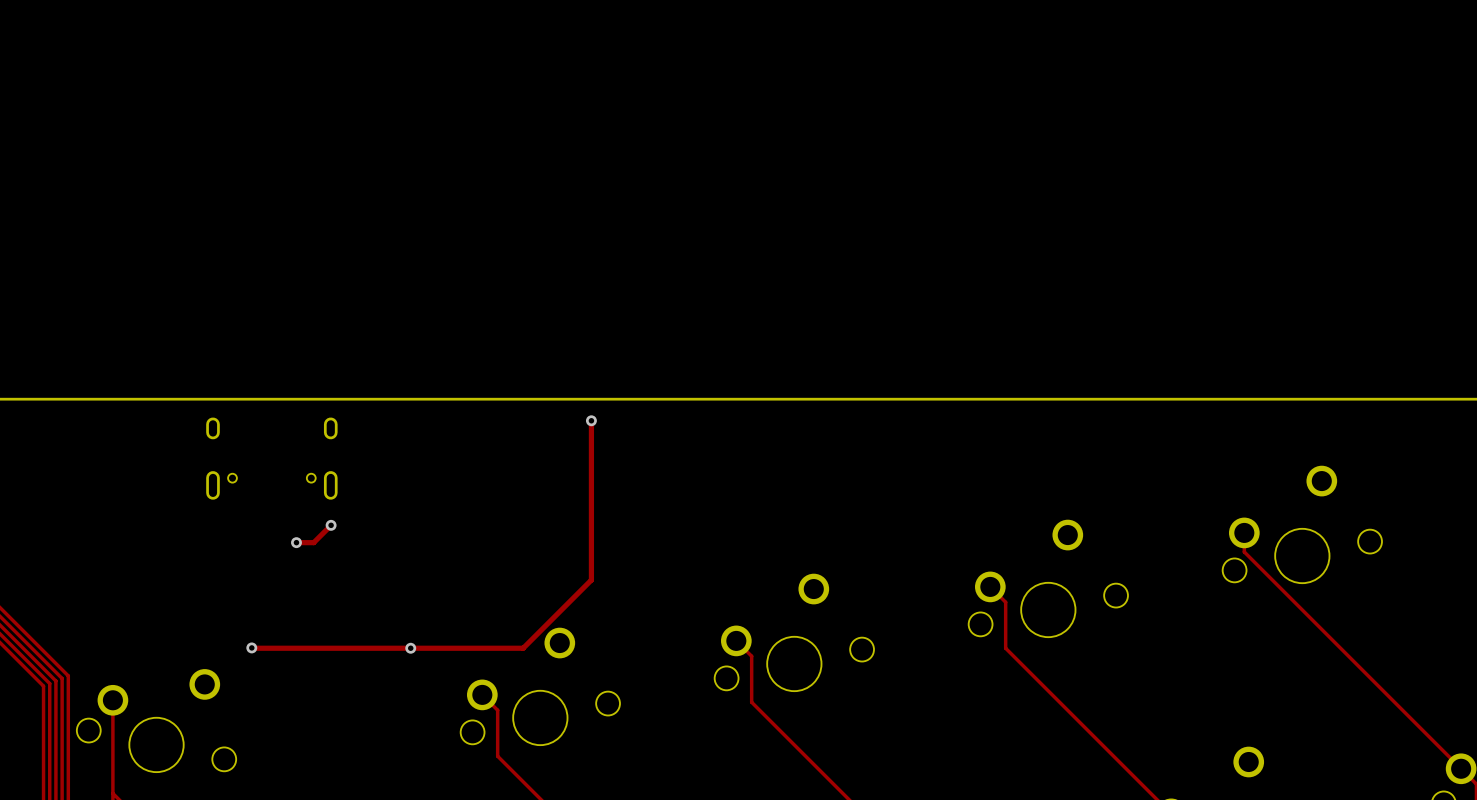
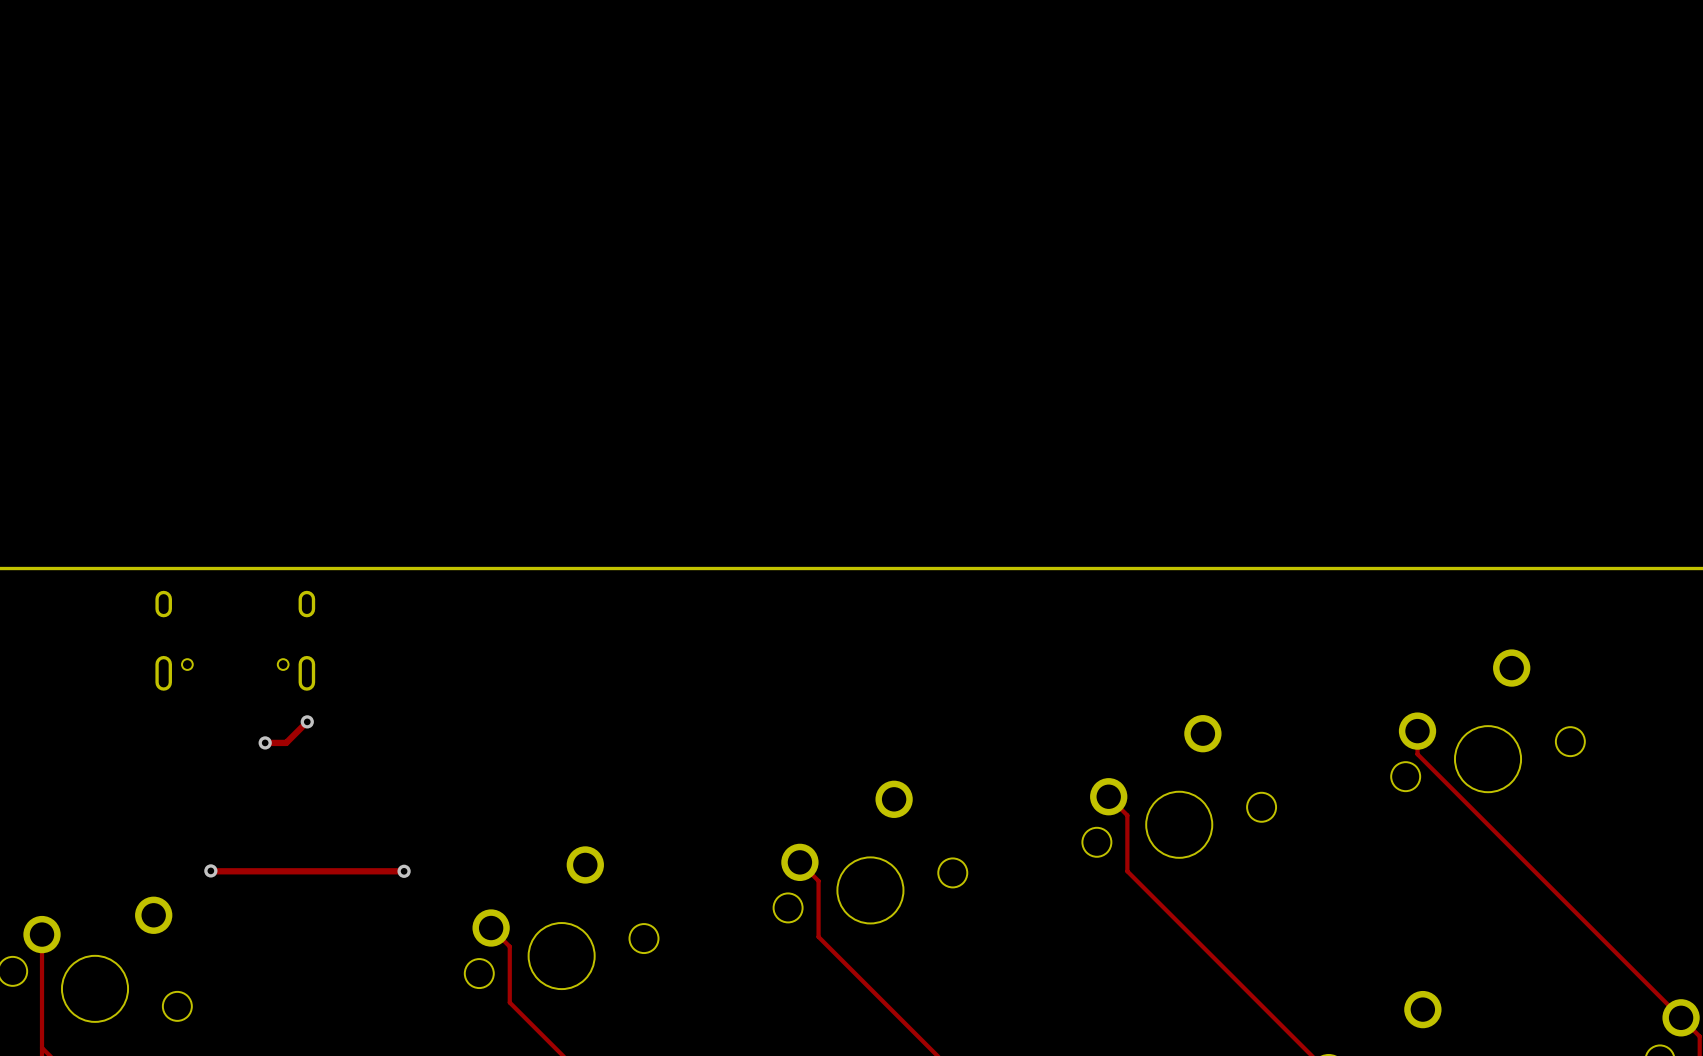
track: (591, 420) (591, 580) (523, 648) (410, 648) -> none
via: (591, 420) -> none

